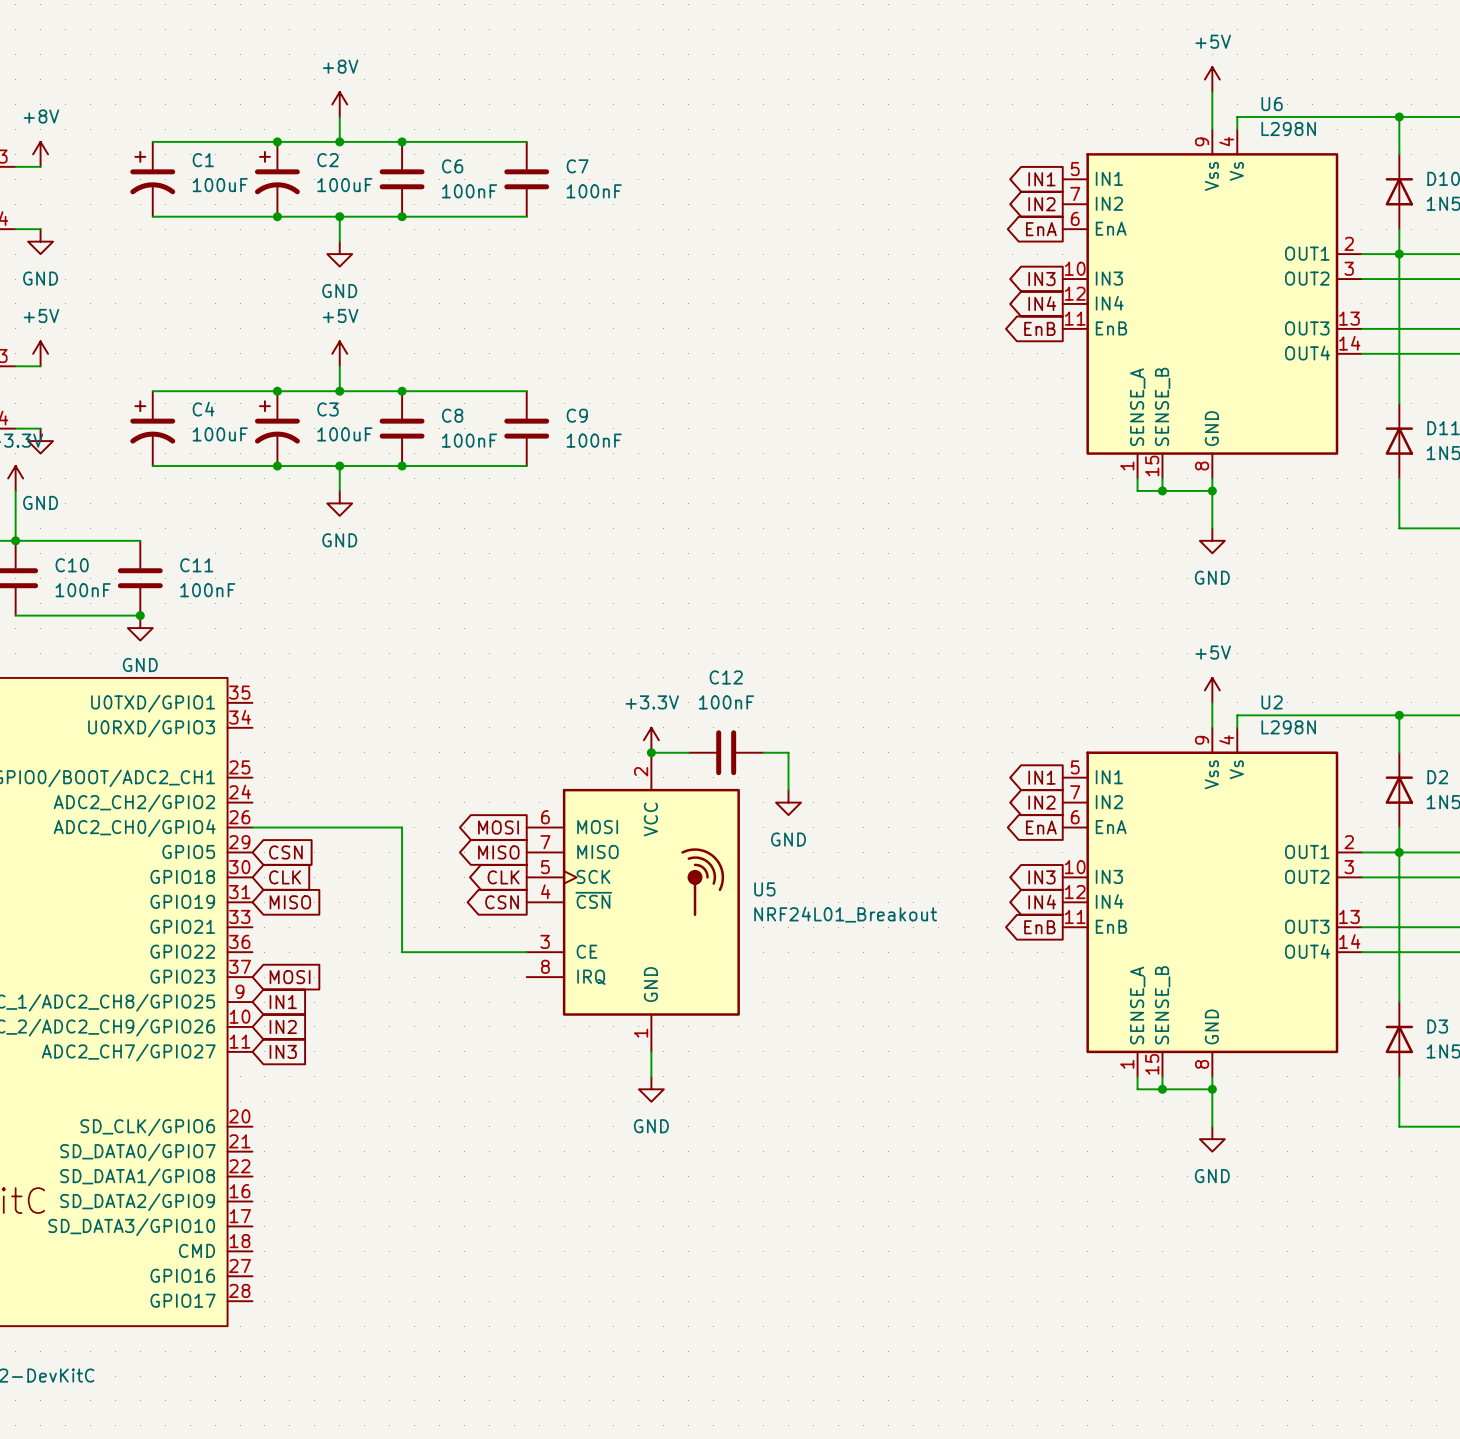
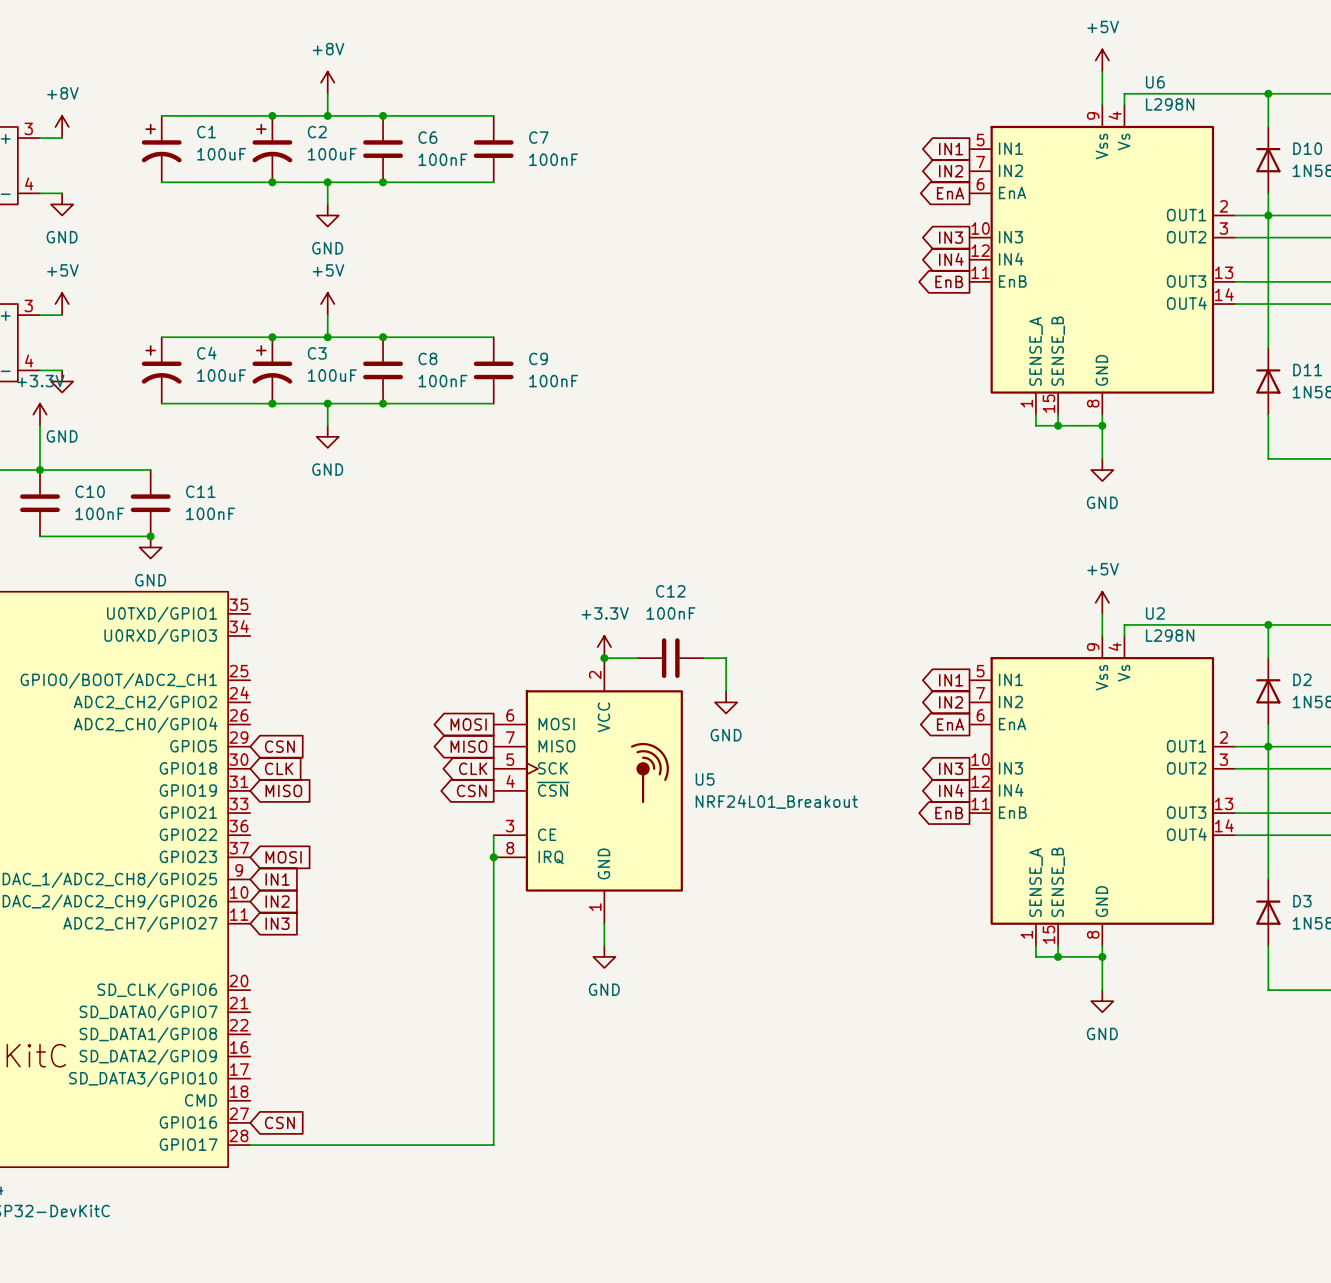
wire: (252, 827) (402, 827) (402, 952) (526, 952) -> (250, 1145) (493, 1145) (493, 835)
junction: none -> (493, 857)
global label: none -> CSN (279, 1122)

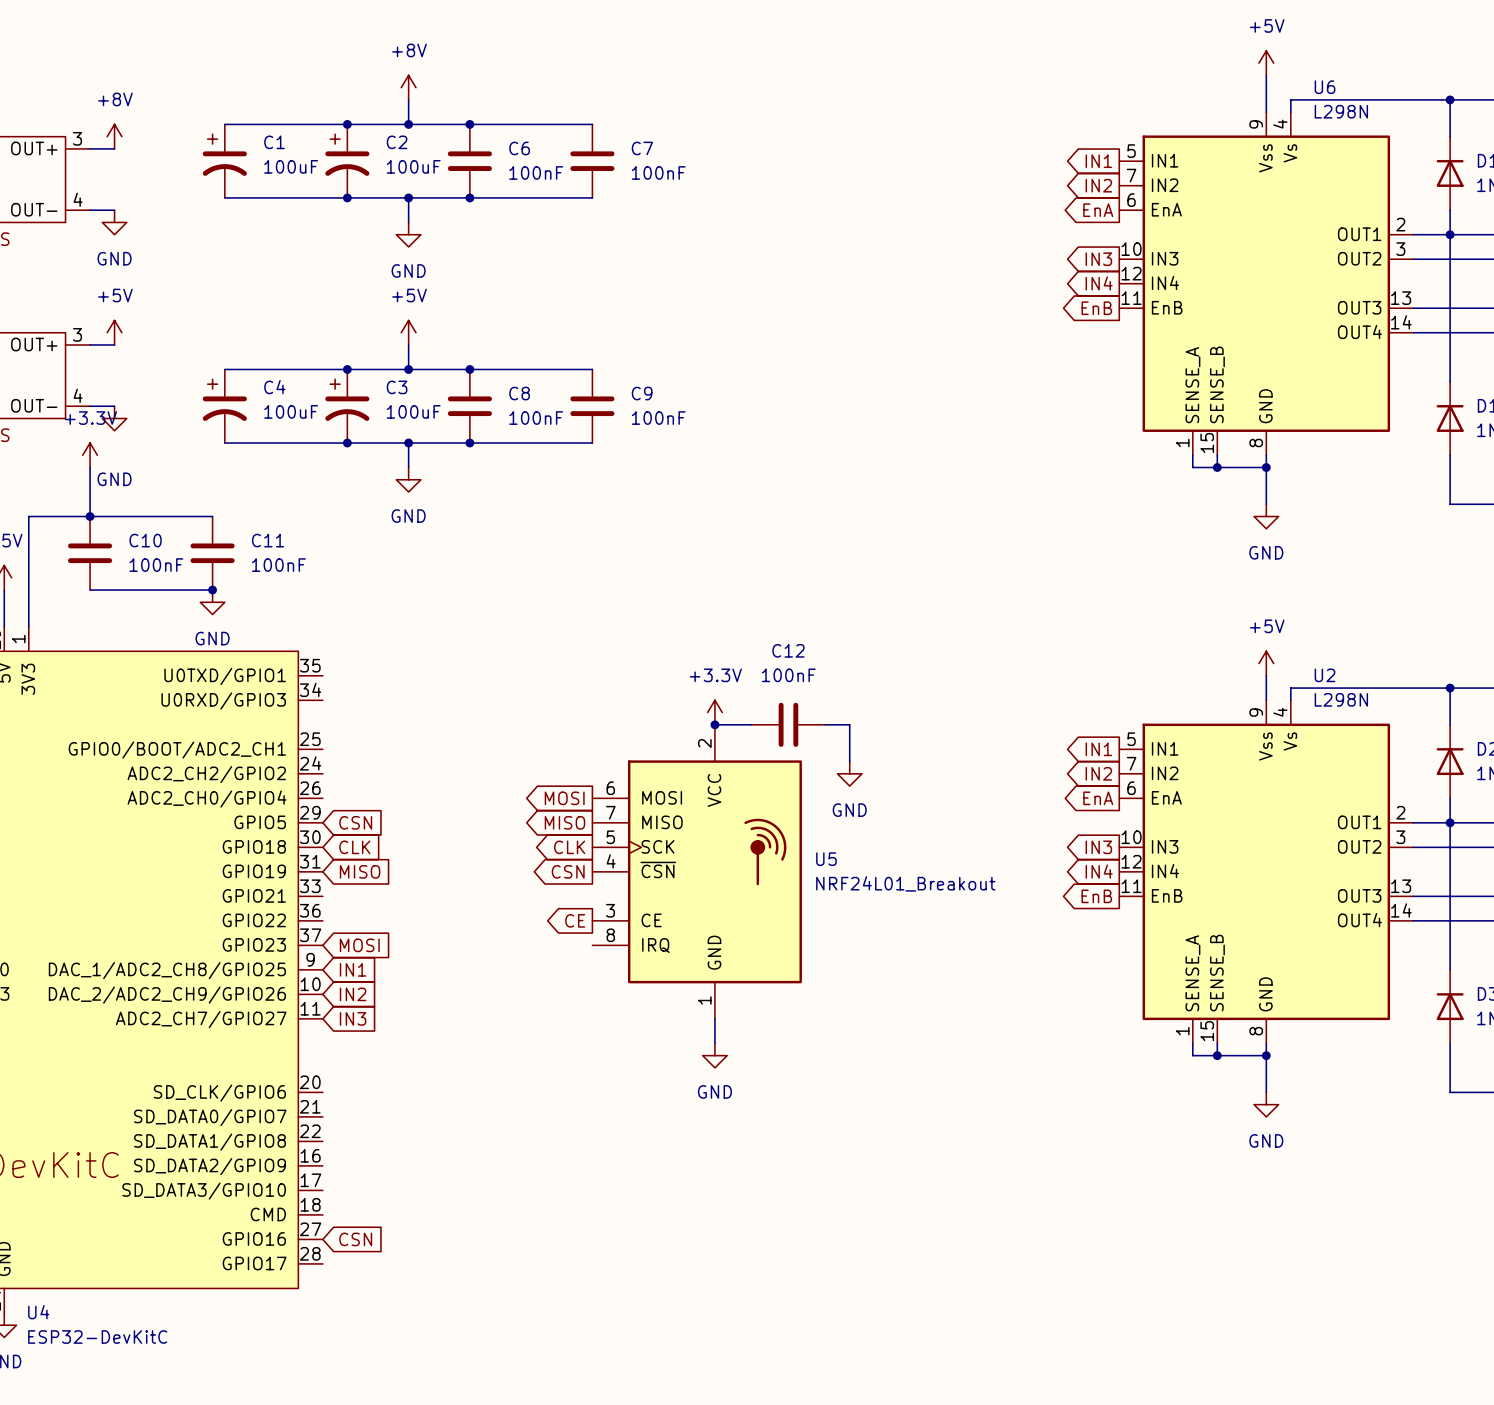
global label: none -> CE (575, 920)
wire: (493, 835) (493, 1145) (250, 1145) -> none
junction: (493, 857) -> none

